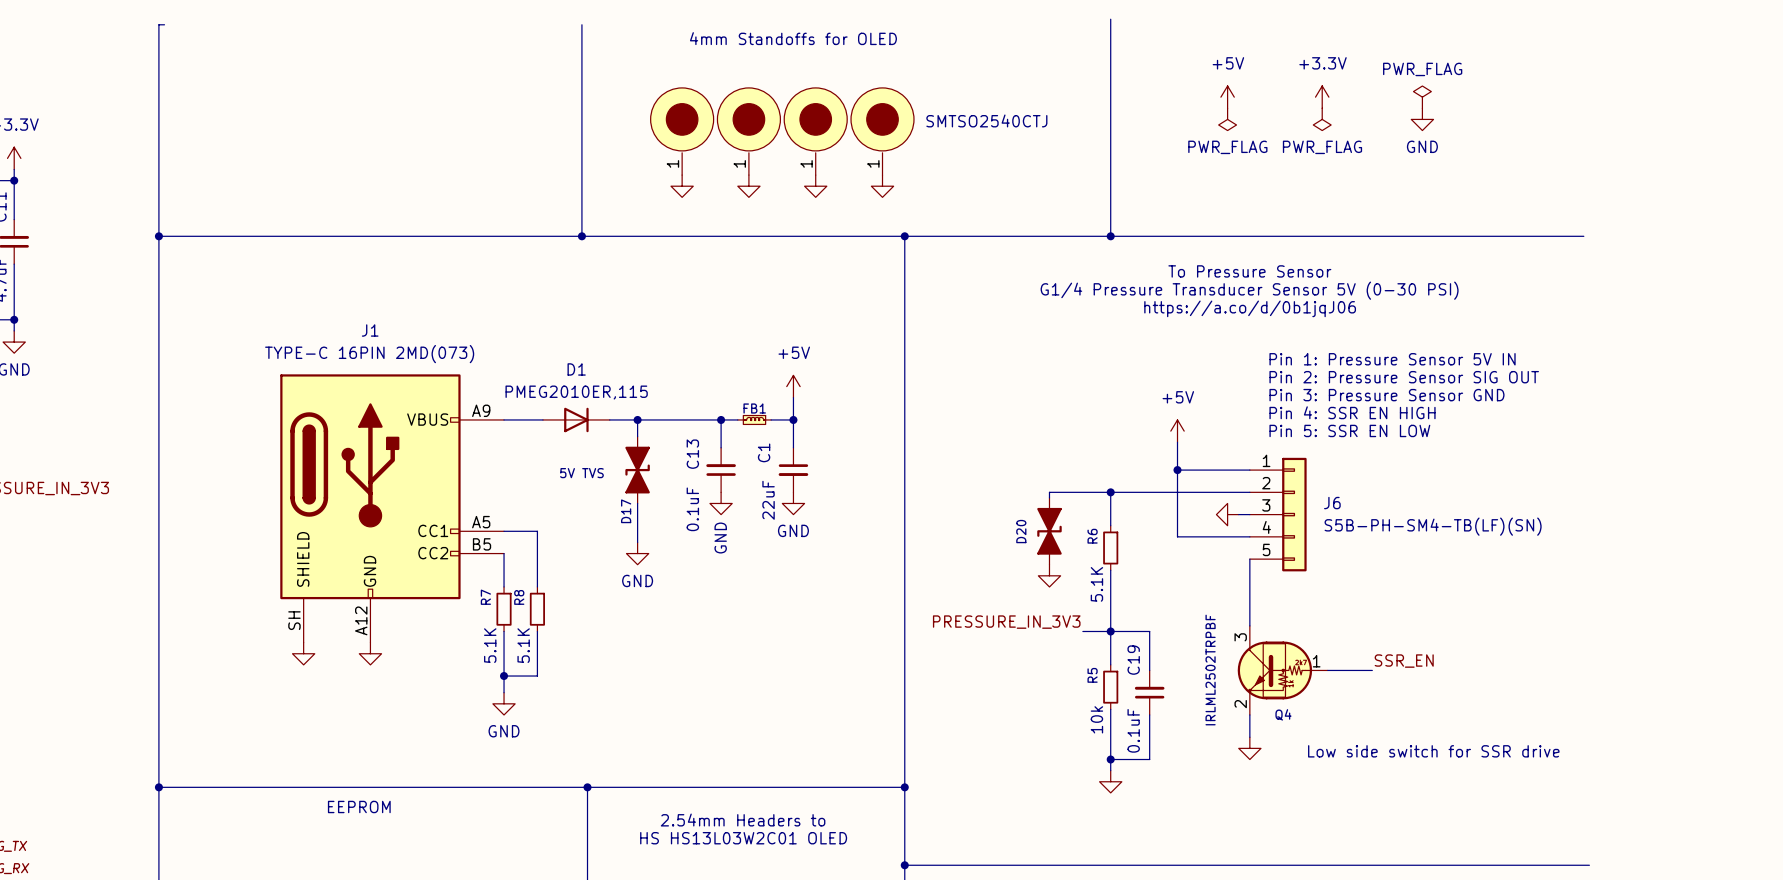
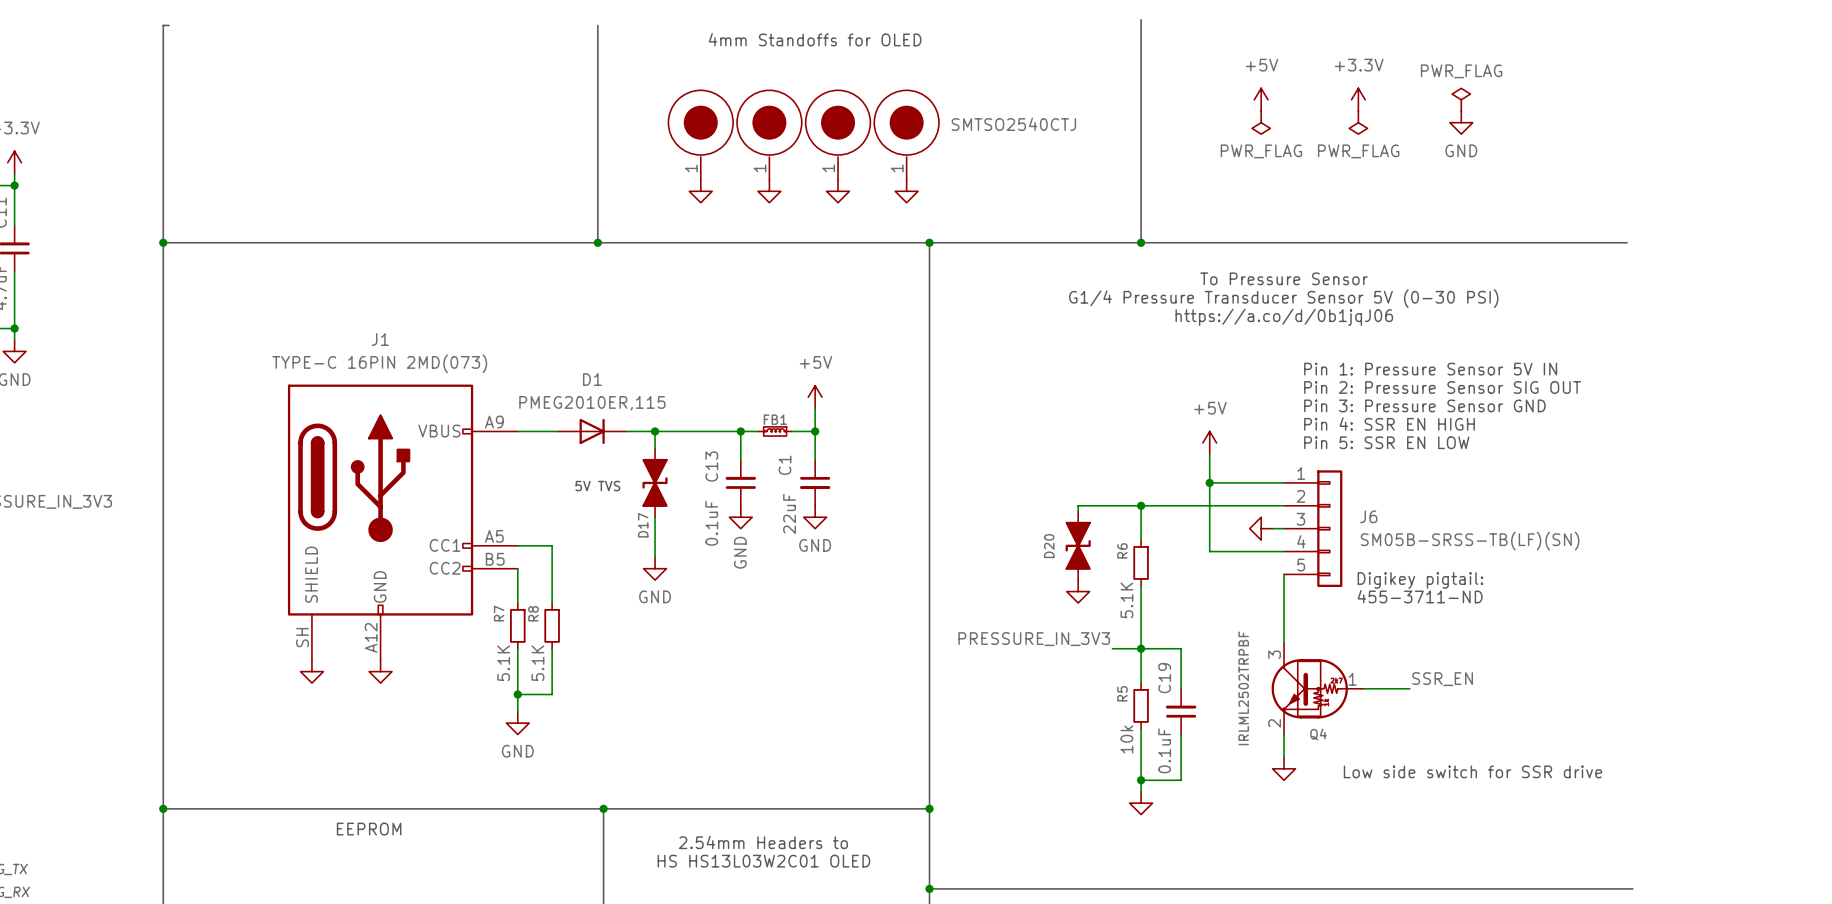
J6 value: S5B-PH-SM4-TB(LF)(SN) (1433, 526) -> SM05B-SRSS-TB(LF)(SN) (1470, 541)
text: none -> Digikey pigtail: (1420, 580)
text: none -> 455-3711-ND (1420, 596)

